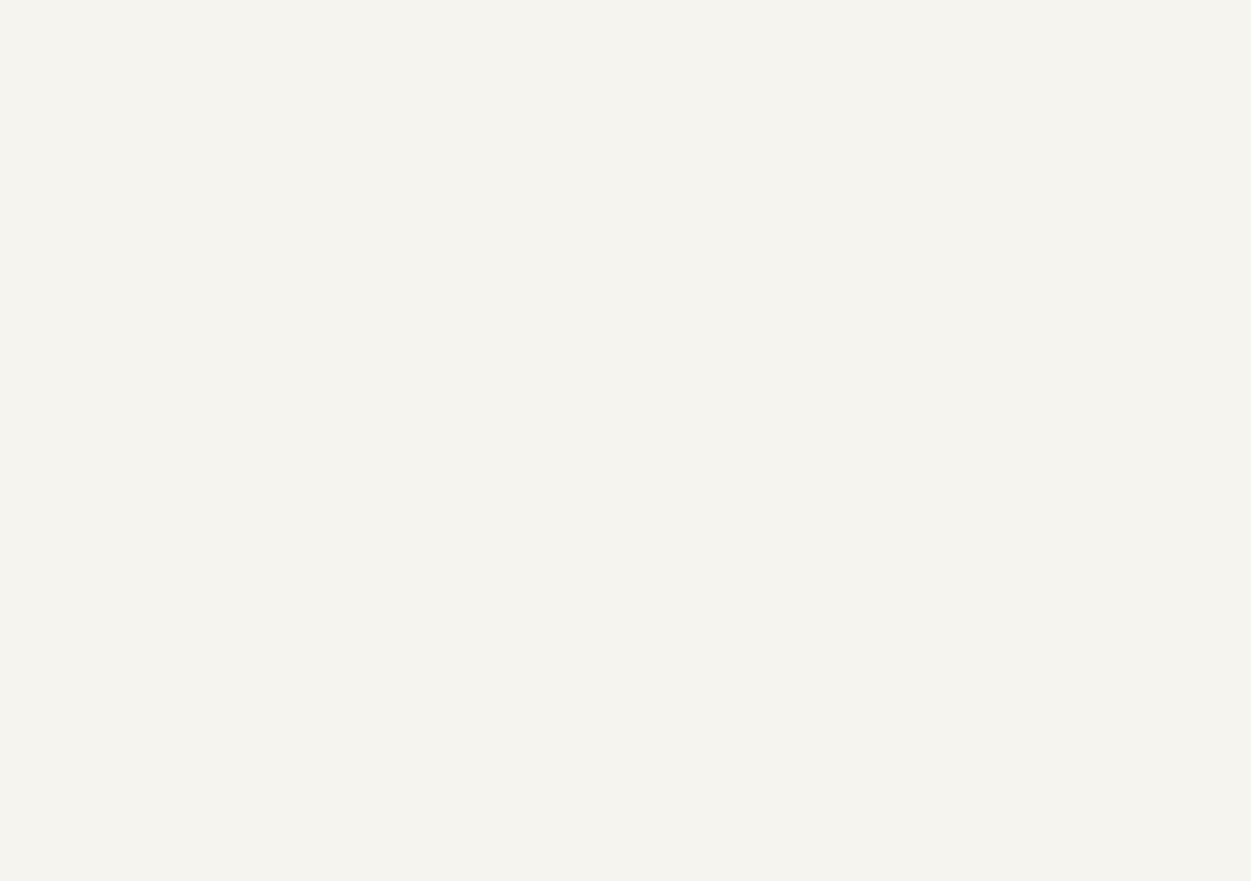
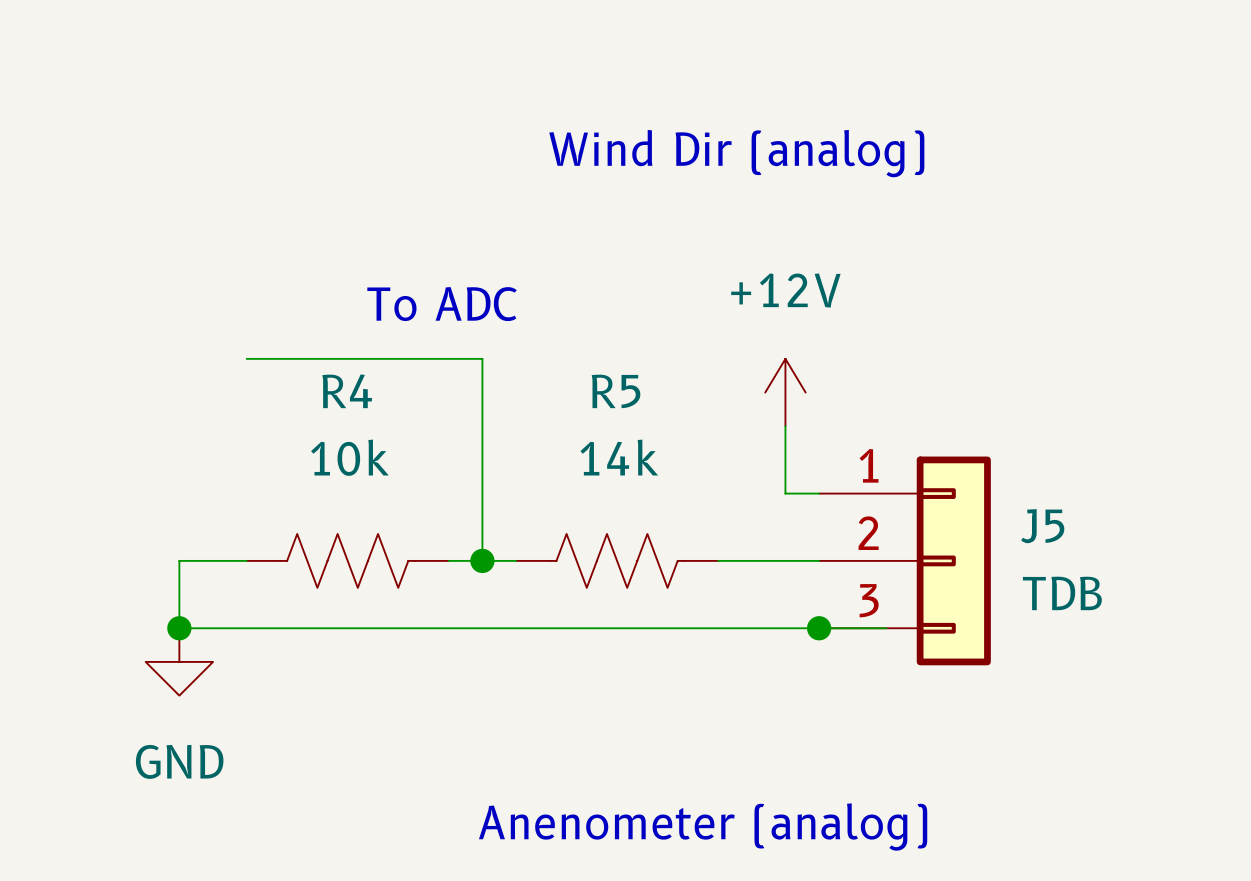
text: none -> Wind Dir (analog) (736, 153)
text: none -> To ADC (442, 304)
wire: none -> (246, 358) (482, 358) (482, 560)
power symbol: none -> +12V (785, 392)
wire: none -> (785, 426) (785, 493) (819, 493)
wire: none -> (246, 560) (179, 560) (179, 628) (886, 628)
R4: none -> 10k (347, 560)
wire: none -> (448, 560) (516, 560)
junction: none -> (482, 560)
R5: none -> 14k (617, 560)
wire: none -> (718, 560) (819, 560)
J5: none -> TDB (904, 560)
junction: none -> (179, 628)
junction: none -> (819, 628)
power symbol: none -> GND (179, 661)
text: none -> Anenometer (analog) (703, 827)

